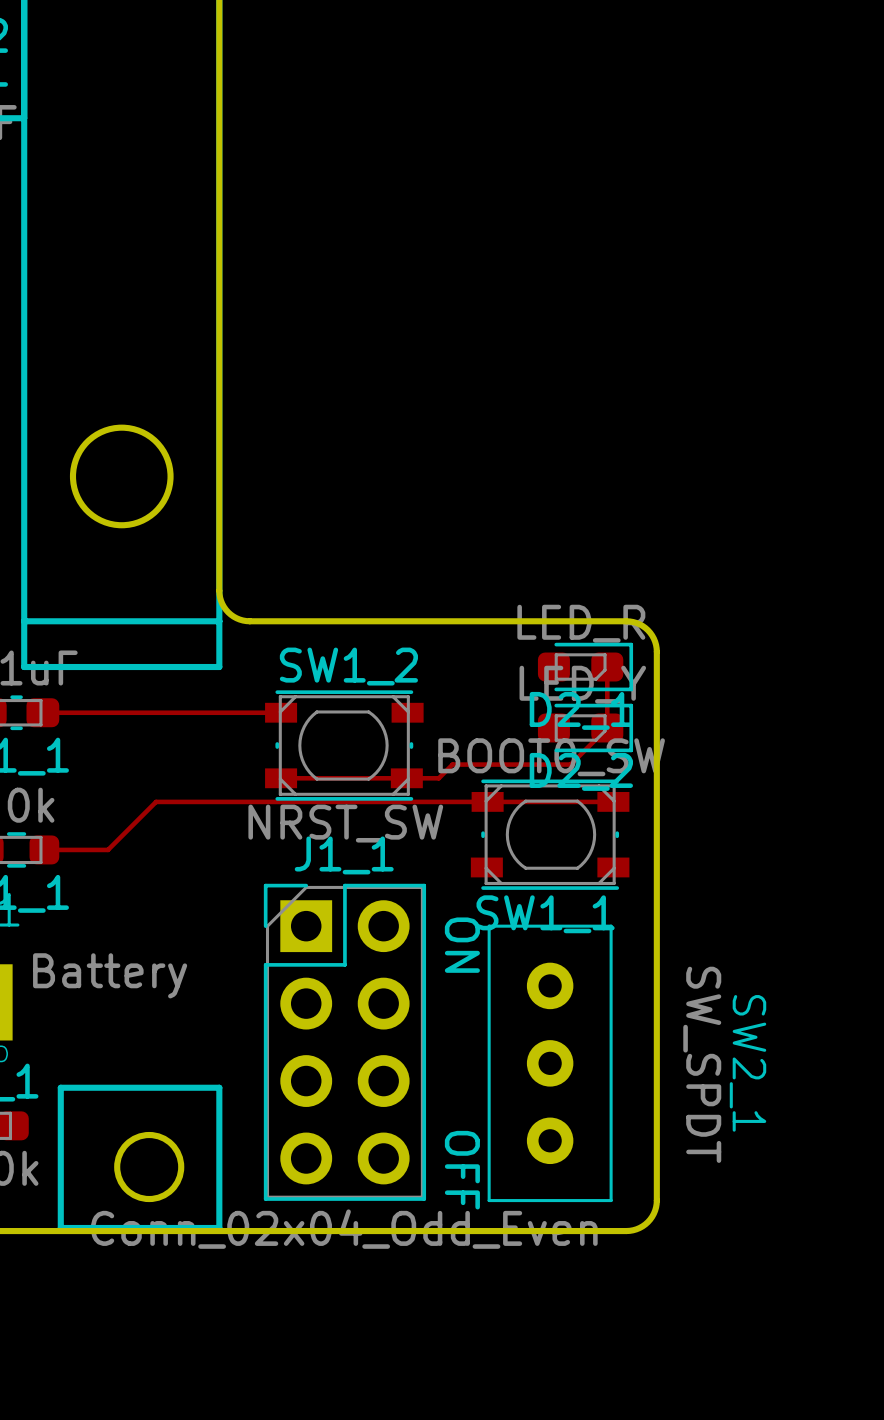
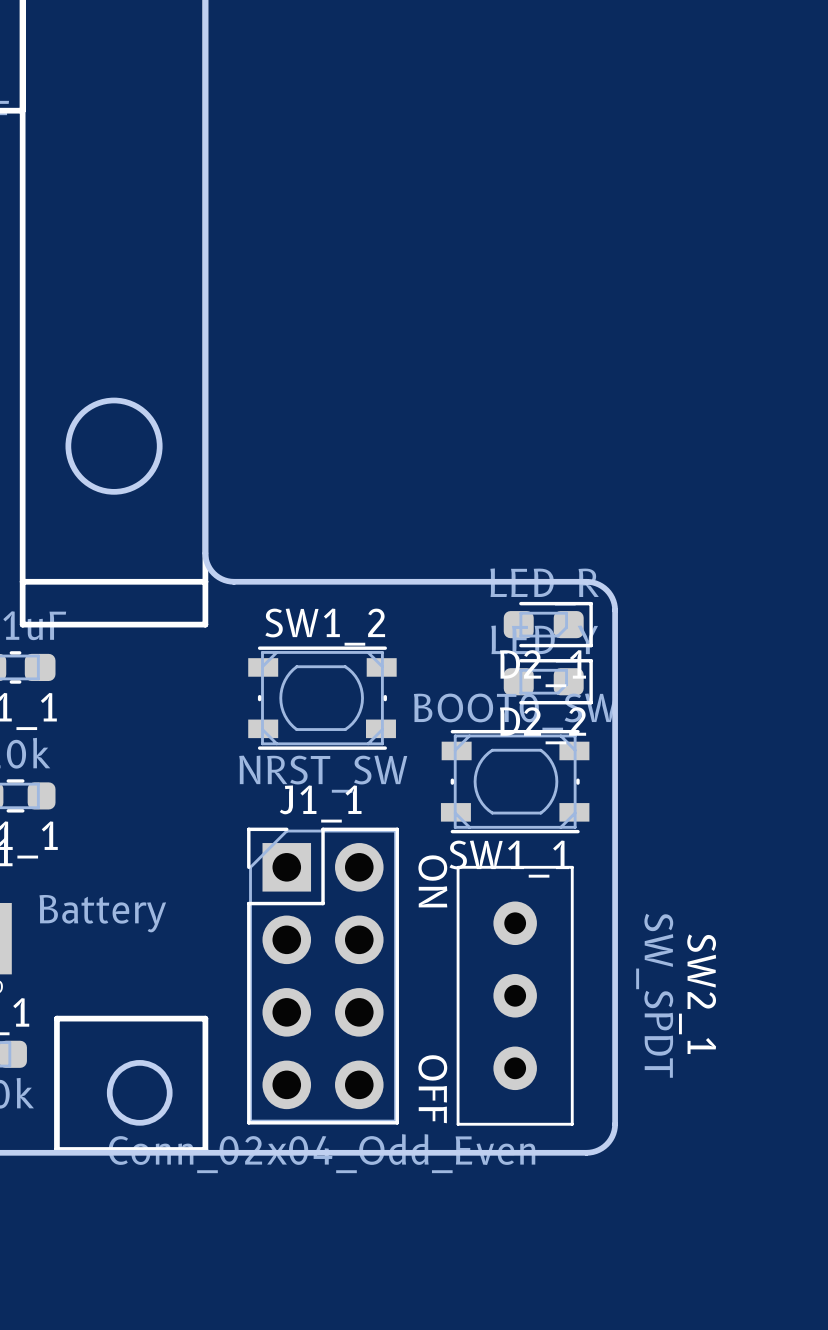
track: (607, 667) (607, 727) (570, 764) (452, 764) (438, 778) (281, 778) -> none
track: (42, 712) (281, 712) -> none
track: (613, 801) (156, 801) (108, 849) (44, 849) -> none

